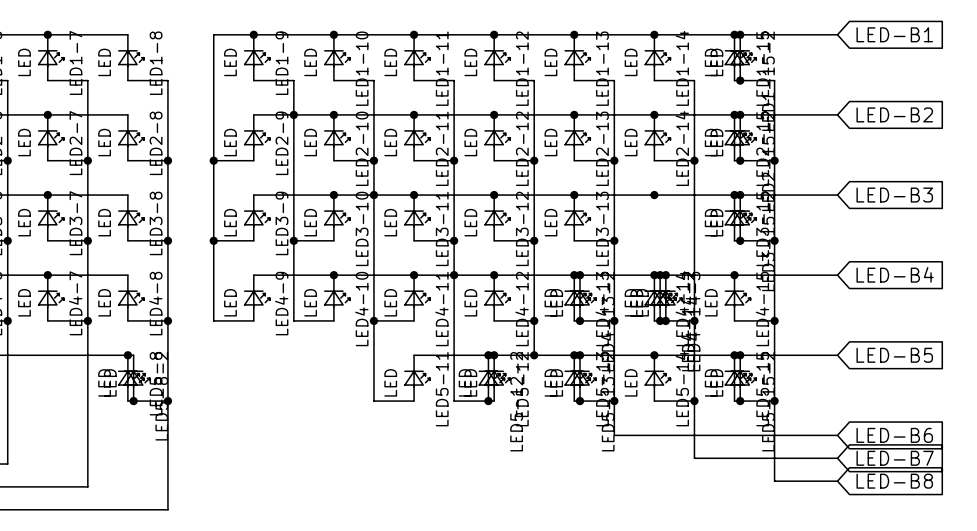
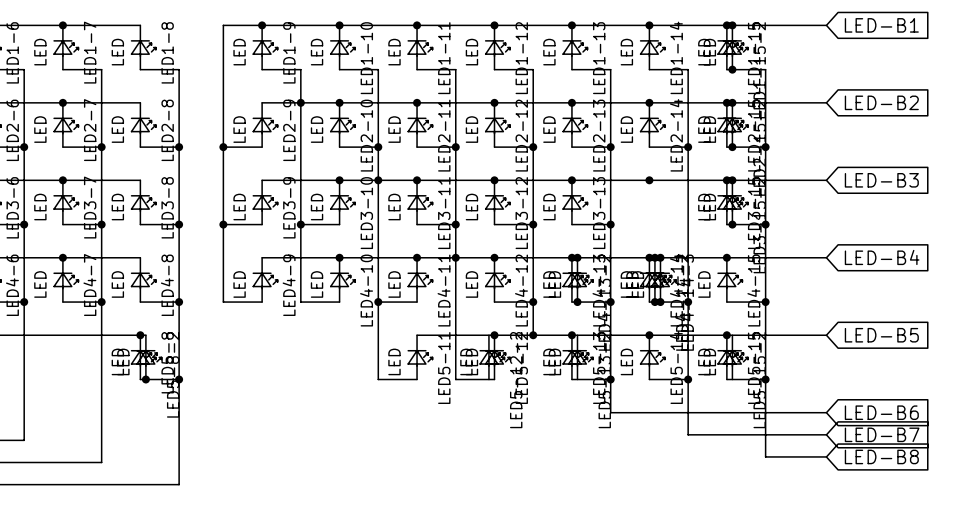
junction: (488, 355) -> none
junction: (579, 355) -> none
junction: (740, 355) -> none
junction: (488, 401) -> none
junction: (579, 401) -> none
junction: (740, 401) -> none

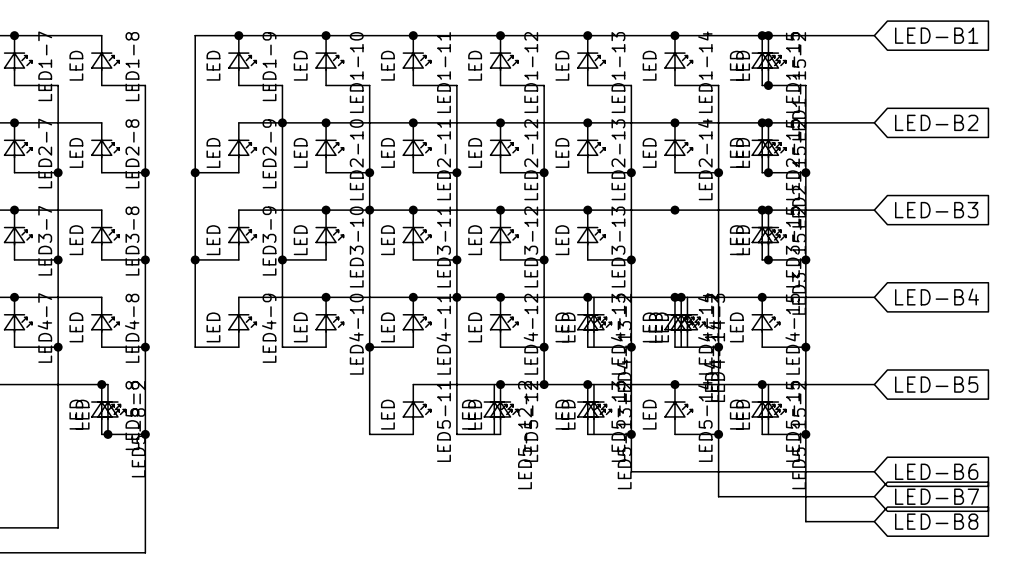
junction: (577, 257) -> none
junction: (660, 257) -> none
junction: (577, 302) -> none
junction: (654, 302) -> none
junction: (660, 302) -> none

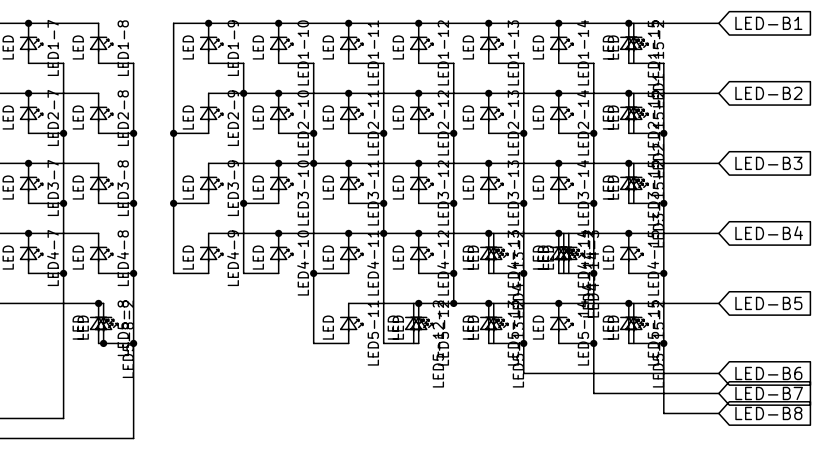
junction: (768, 35) -> none
junction: (768, 85) -> none
junction: (768, 122) -> none
junction: (768, 172) -> none
junction: (768, 210) -> none
LED3-14: none -> LED (561, 183)
wire: none -> (558, 203) (593, 203)
junction: none -> (593, 203)
junction: (768, 259) -> none
junction: (681, 297) -> none

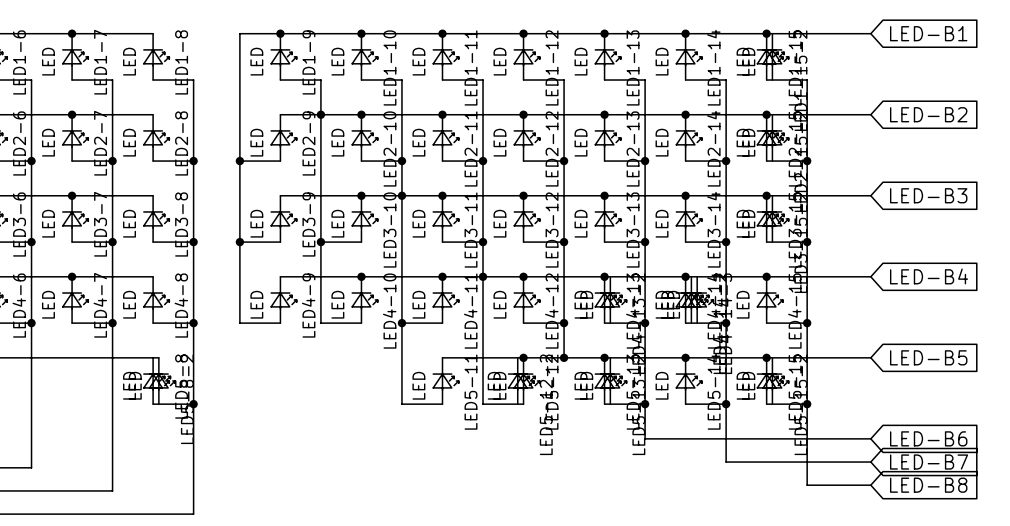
junction: (98, 303) -> none
junction: (103, 343) -> none

